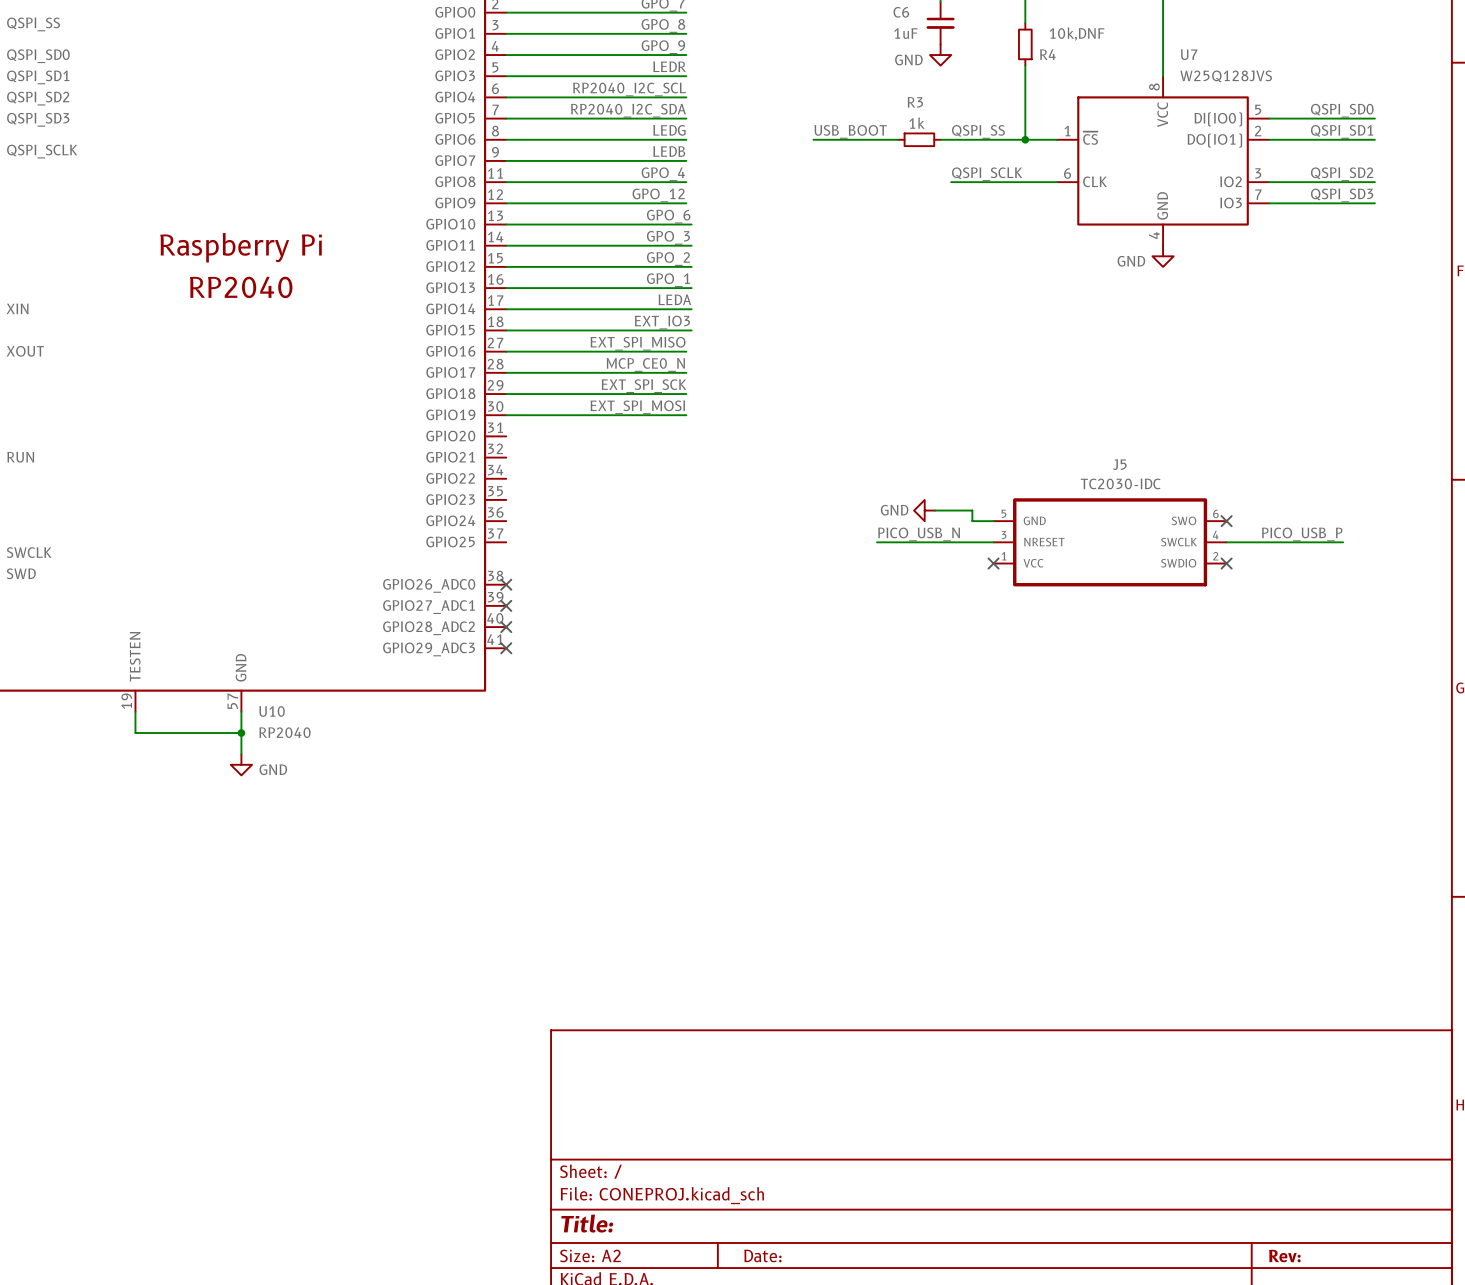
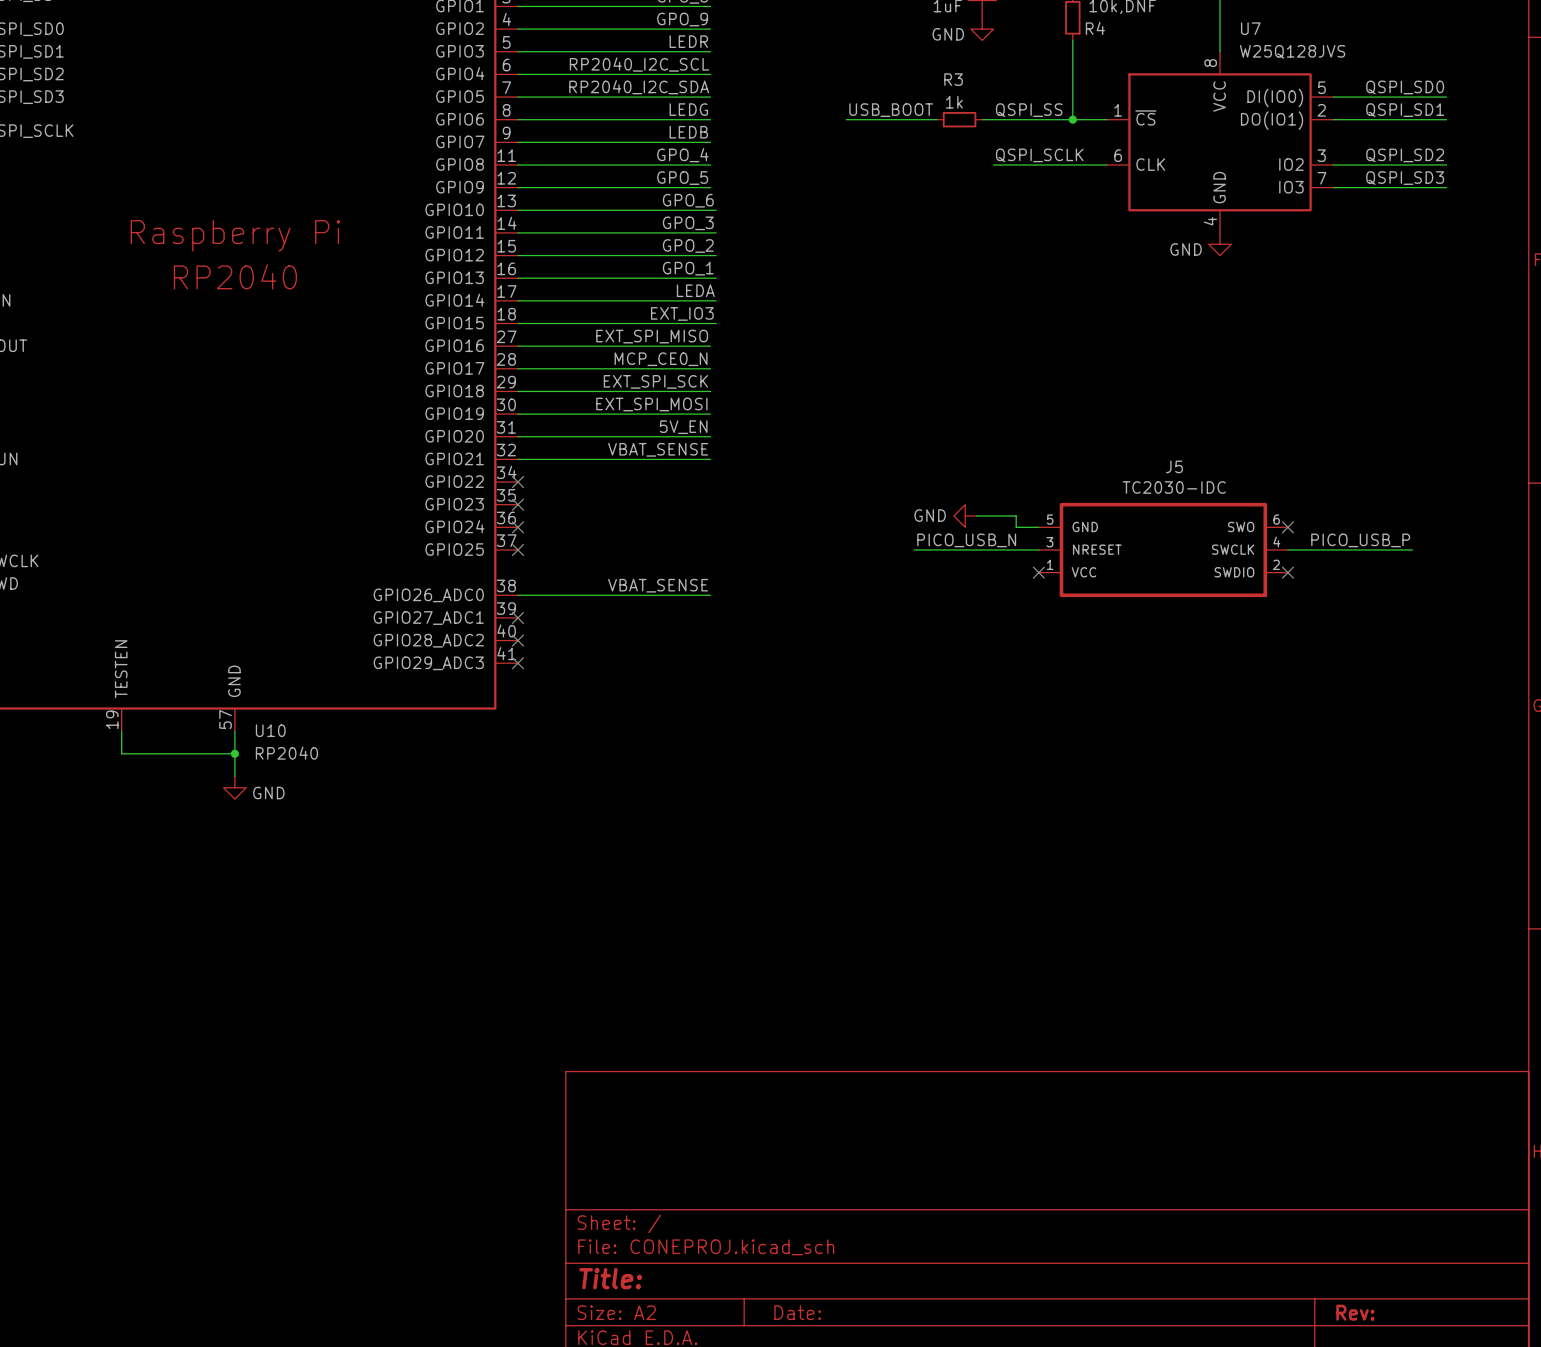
label: GPO_12 (658, 195) -> GPO_5 (682, 178)
label: none -> 5V_EN (683, 427)
wire: none -> (517, 436) (710, 436)
label: none -> VBAT_SENSE (658, 449)
wire: none -> (517, 459) (710, 459)
no-connect mark: none -> (517, 482)
no-connect mark: none -> (517, 504)
no-connect mark: none -> (517, 527)
no-connect mark: none -> (517, 549)
label: none -> VBAT_SENSE (658, 585)
wire: none -> (517, 595) (710, 595)
no-connect mark: (506, 584) -> none

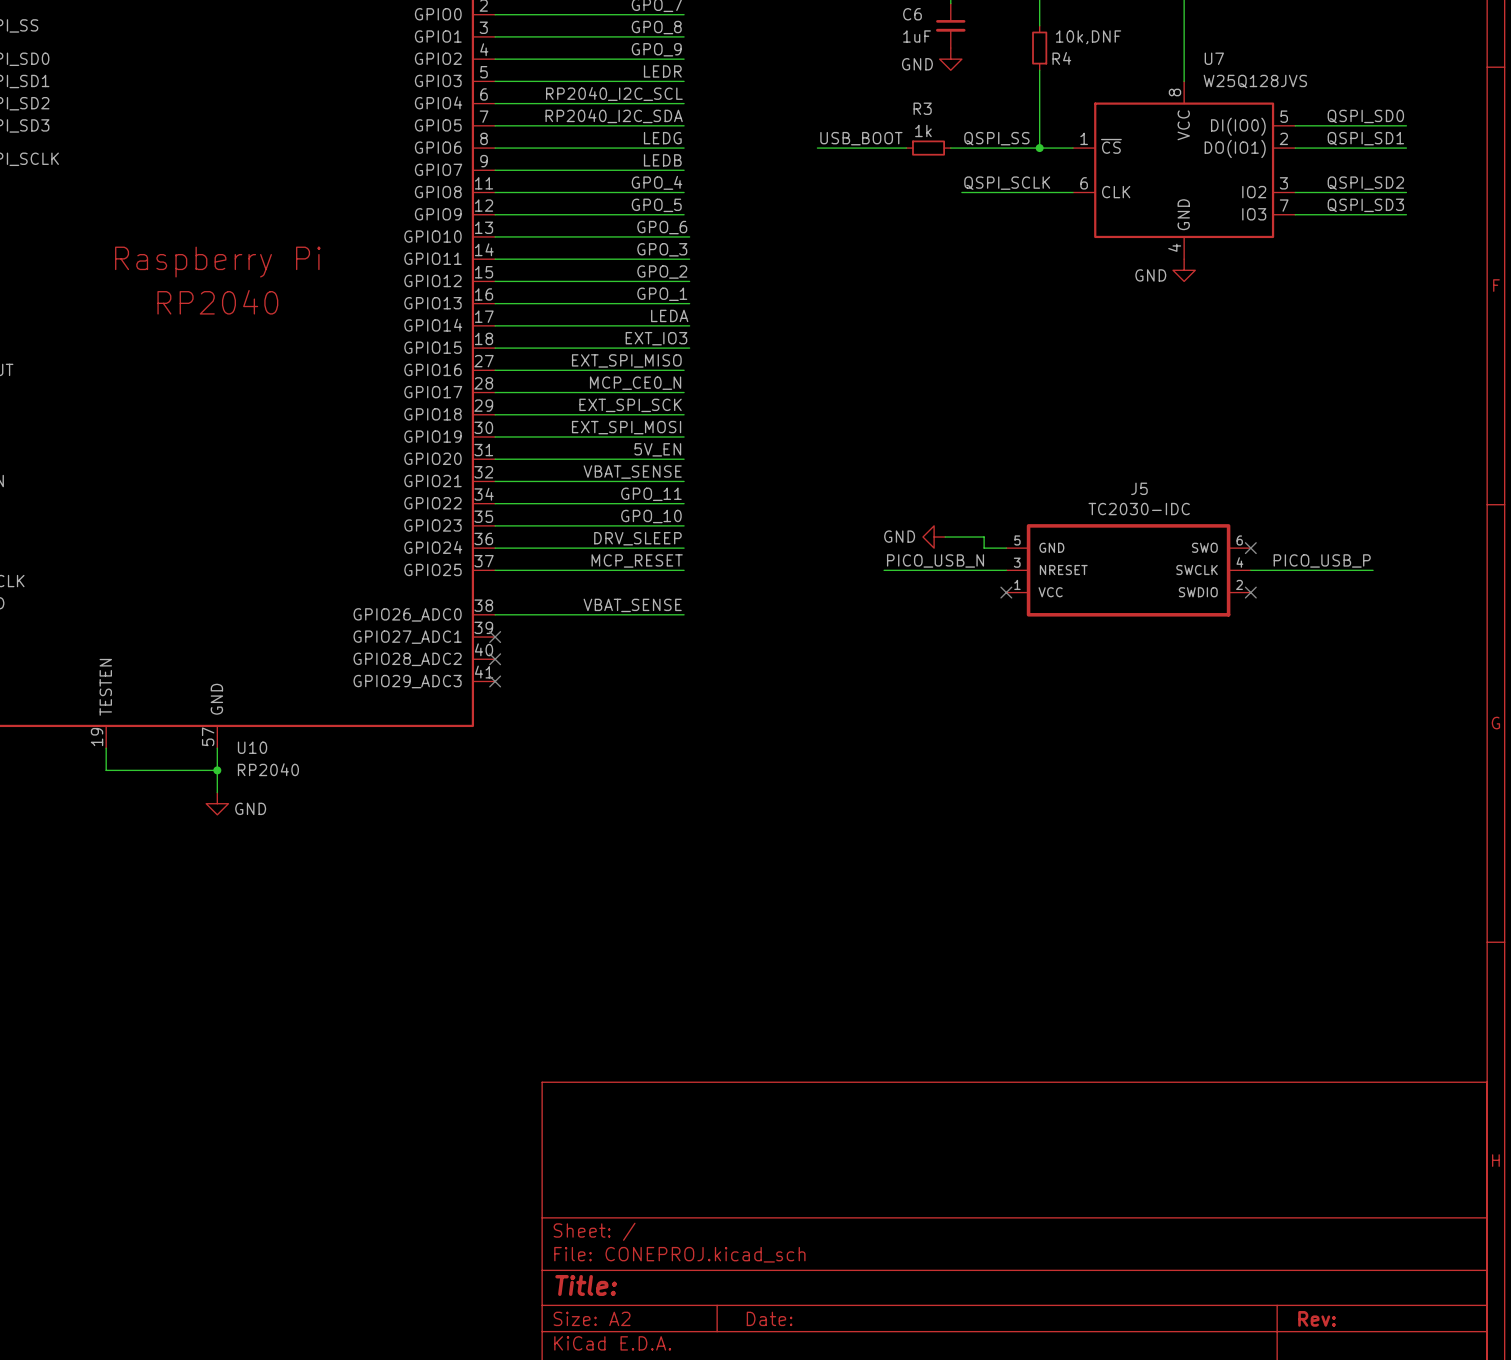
label: none -> GPO_11 (651, 494)
wire: none -> (495, 503) (684, 503)
no-connect mark: (517, 482) -> none
label: none -> GPO_10 (651, 516)
wire: none -> (495, 525) (684, 525)
no-connect mark: (517, 504) -> none
label: none -> DRV_SLEEP (637, 538)
wire: none -> (495, 548) (684, 548)
no-connect mark: (517, 527) -> none
label: none -> MCP_RESET (637, 560)
wire: none -> (495, 570) (684, 570)
no-connect mark: (517, 549) -> none

